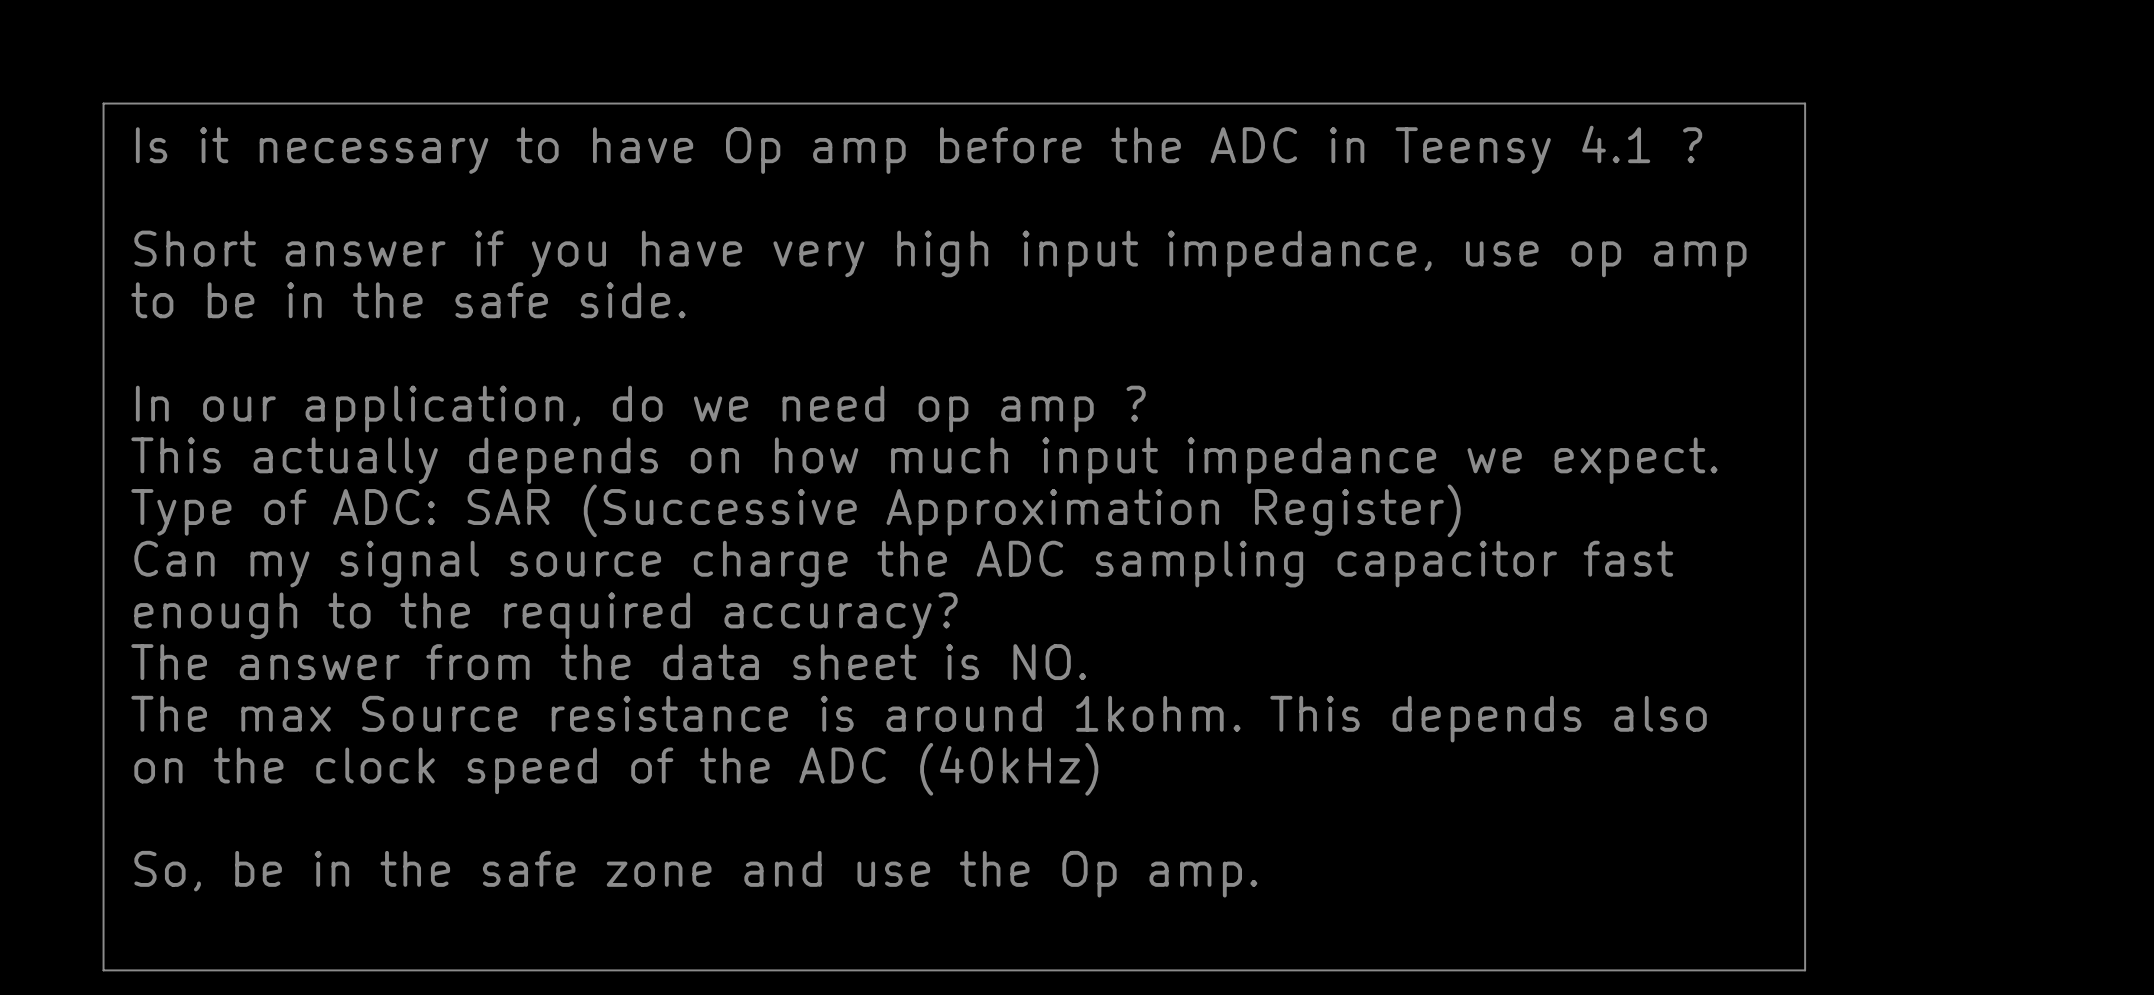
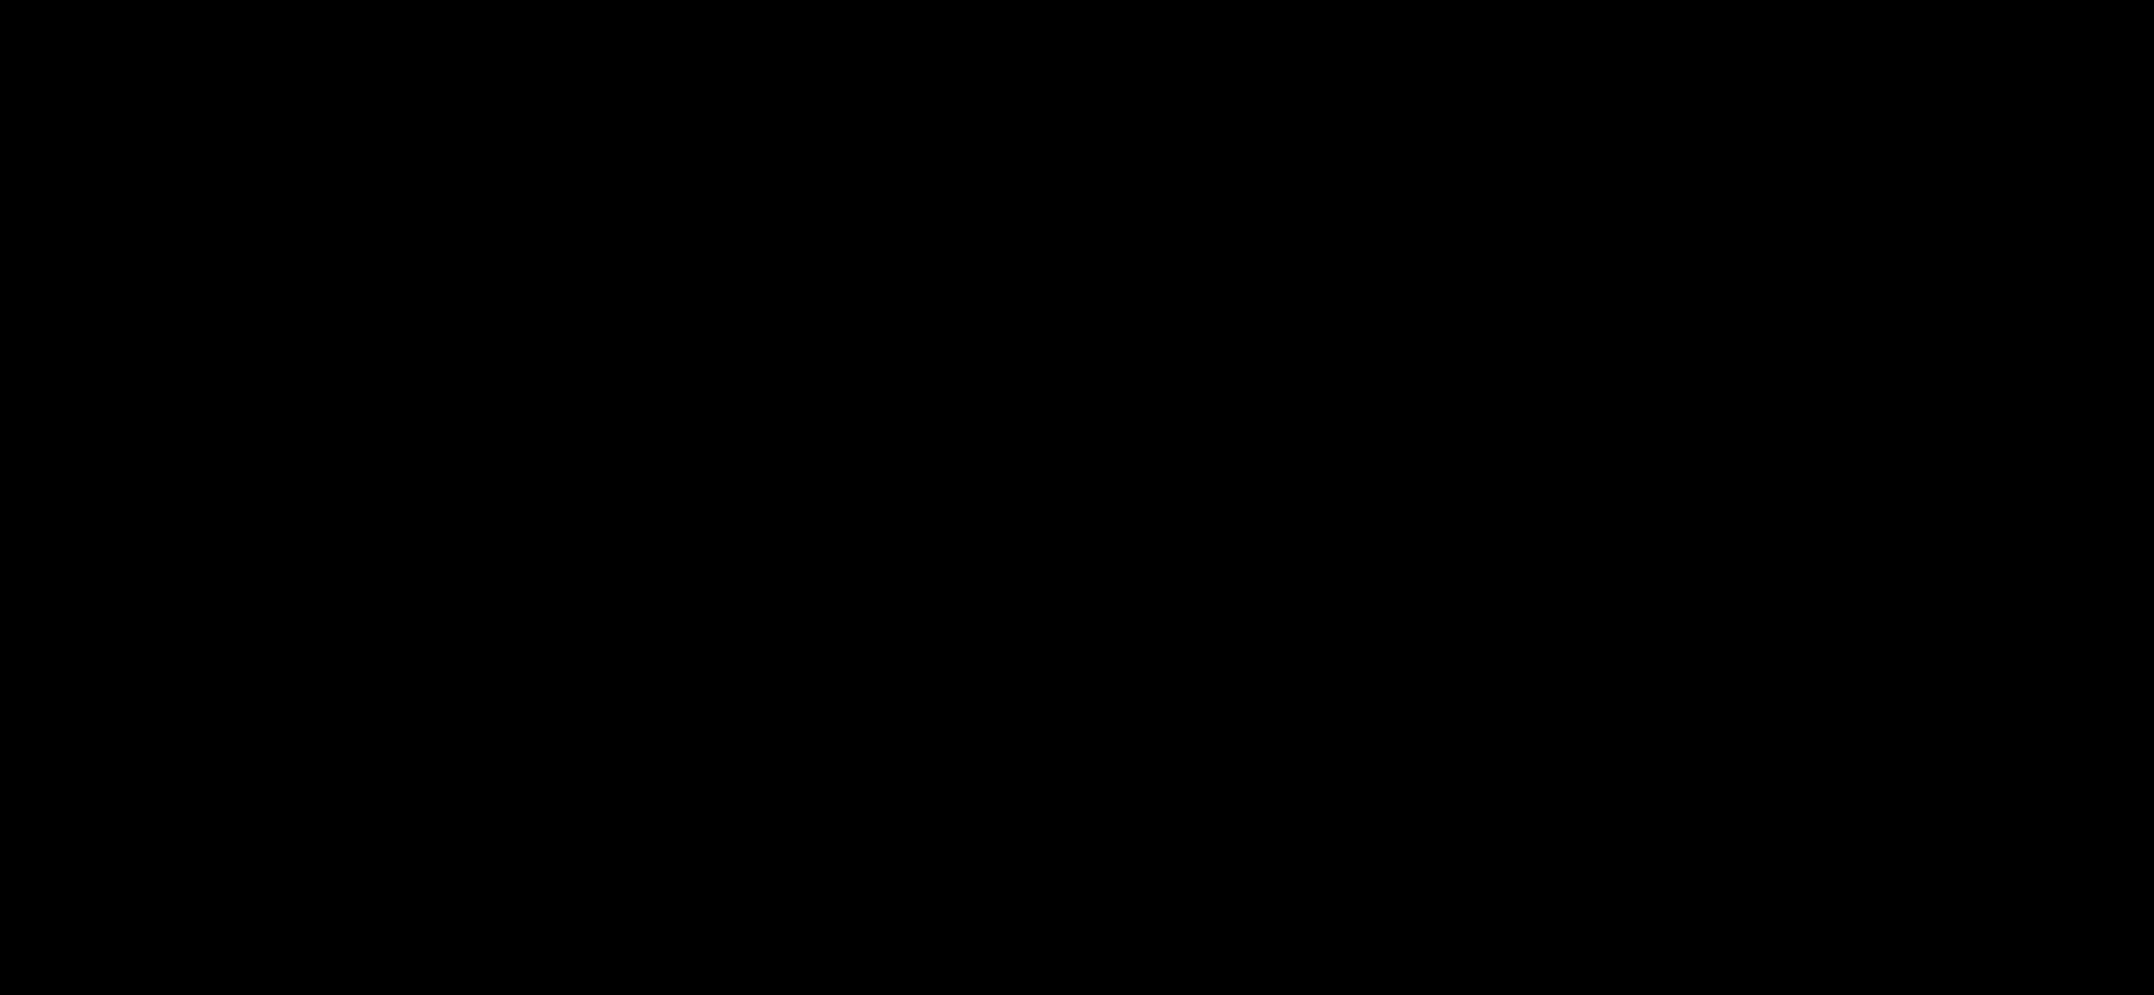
line: (103, 103) (1805, 103) (1805, 970) (103, 970) (103, 103) -> none
text: Is it necessary to have Op amp before the ADC in Teensy 4.1 ? (919, 149) -> none
text: Short answer if you have very high input impedance, use op amp (940, 253) -> none
text: to be in the safe side. (408, 300) -> none
text: In our application, do we need op amp ? (640, 409) -> none
text: This actually depends on how much input impedance we expect. (924, 460) -> none
text: Type of ADC: SAR (Successive Approximation Register) (795, 510) -> none
text: Can my signal source charge the ADC sampling capacitor fast (903, 564) -> none
text: enough to the required accuracy? (546, 615) -> none
text: The answer from the data sheet is NO. (608, 662) -> none
text: The max Source resistance is around 1kohm. This depends also (919, 719) -> none
text: on the clock speed of the ADC (40kHz) (616, 769) -> none
text: So, be in the safe zone and use the Op amp. (695, 874) -> none

